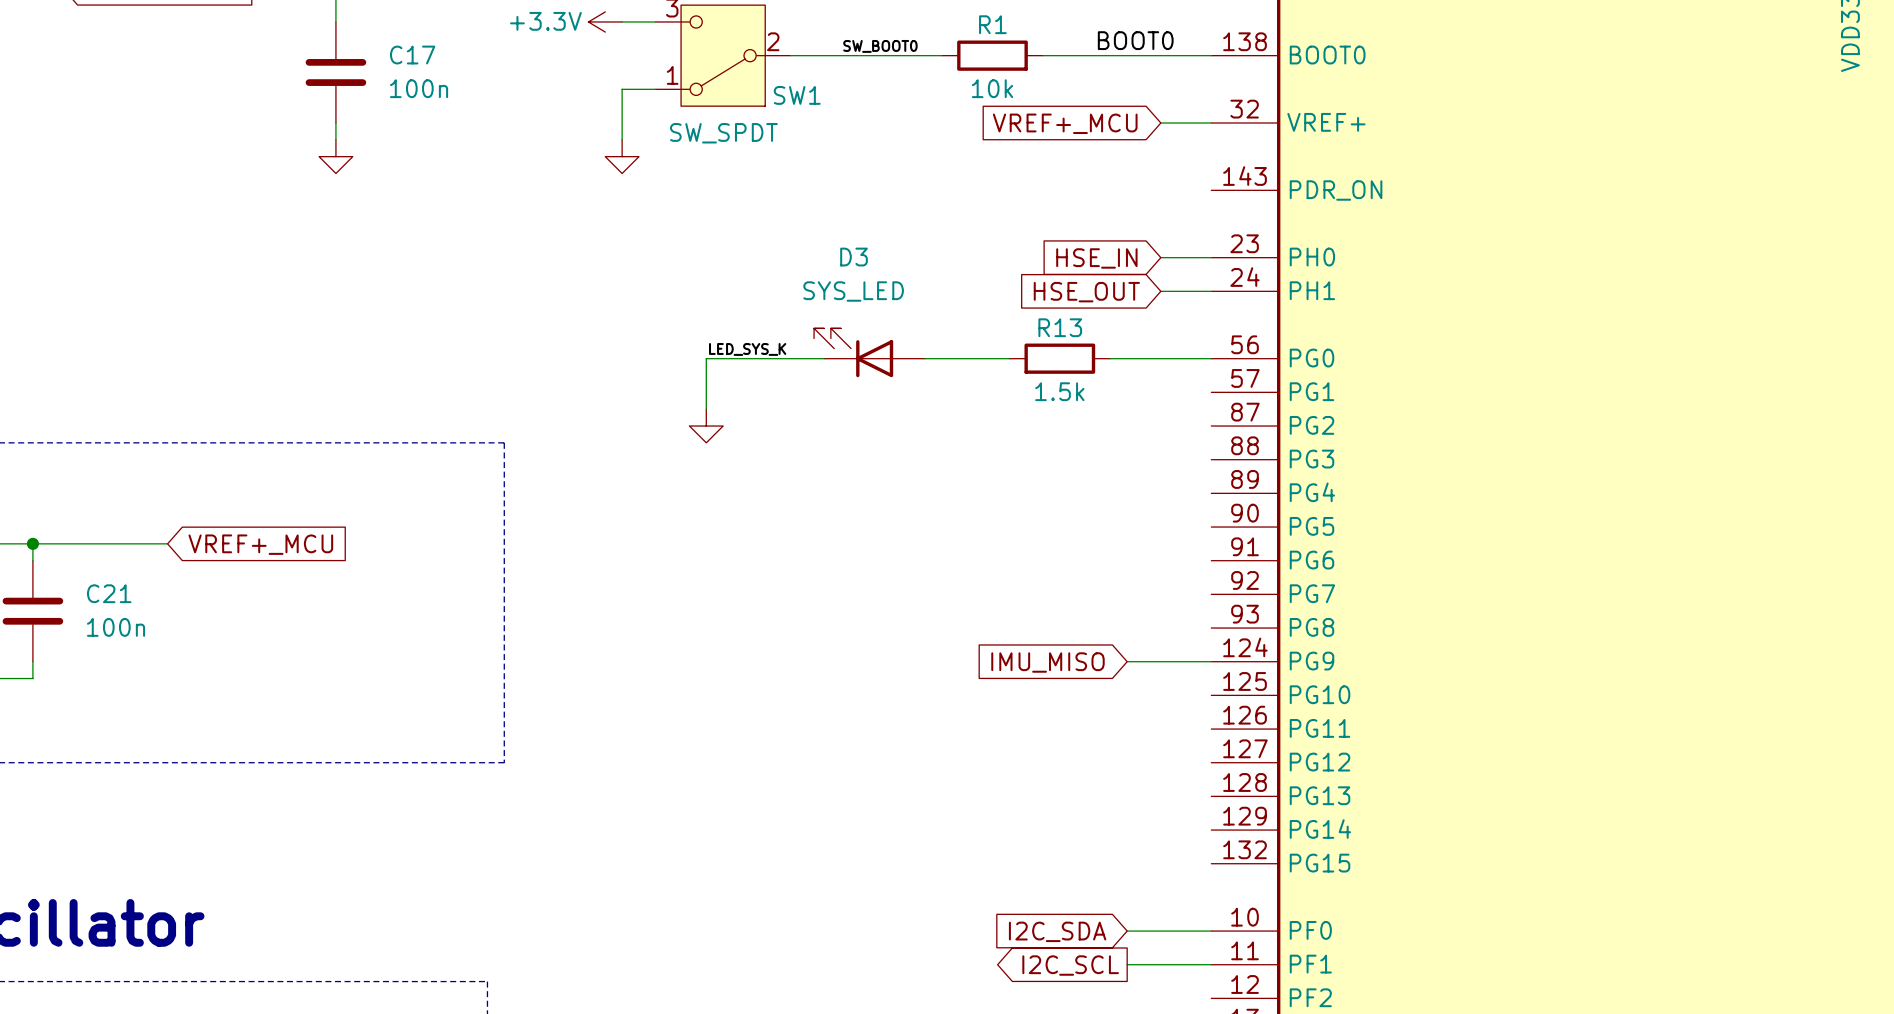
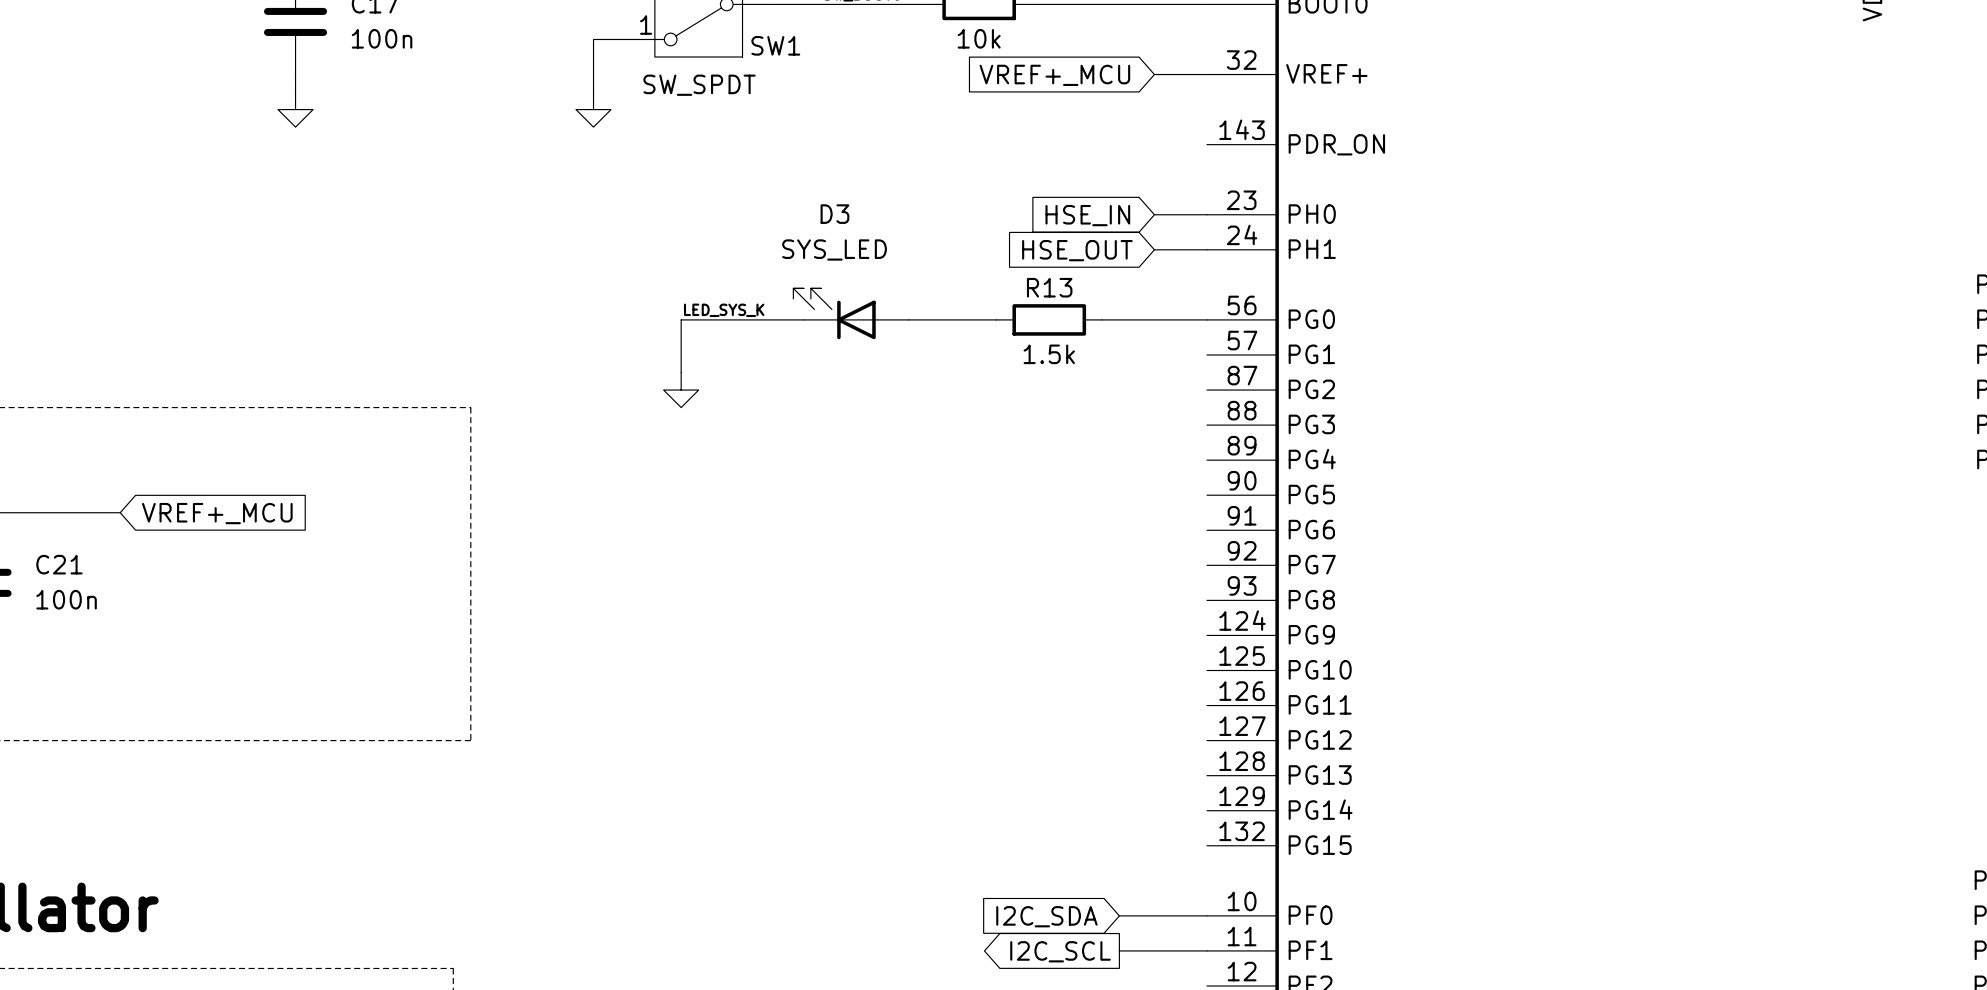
wire: (1127, 661) (1211, 661) -> none
global label: IMU_MISO (1047, 662) -> none

